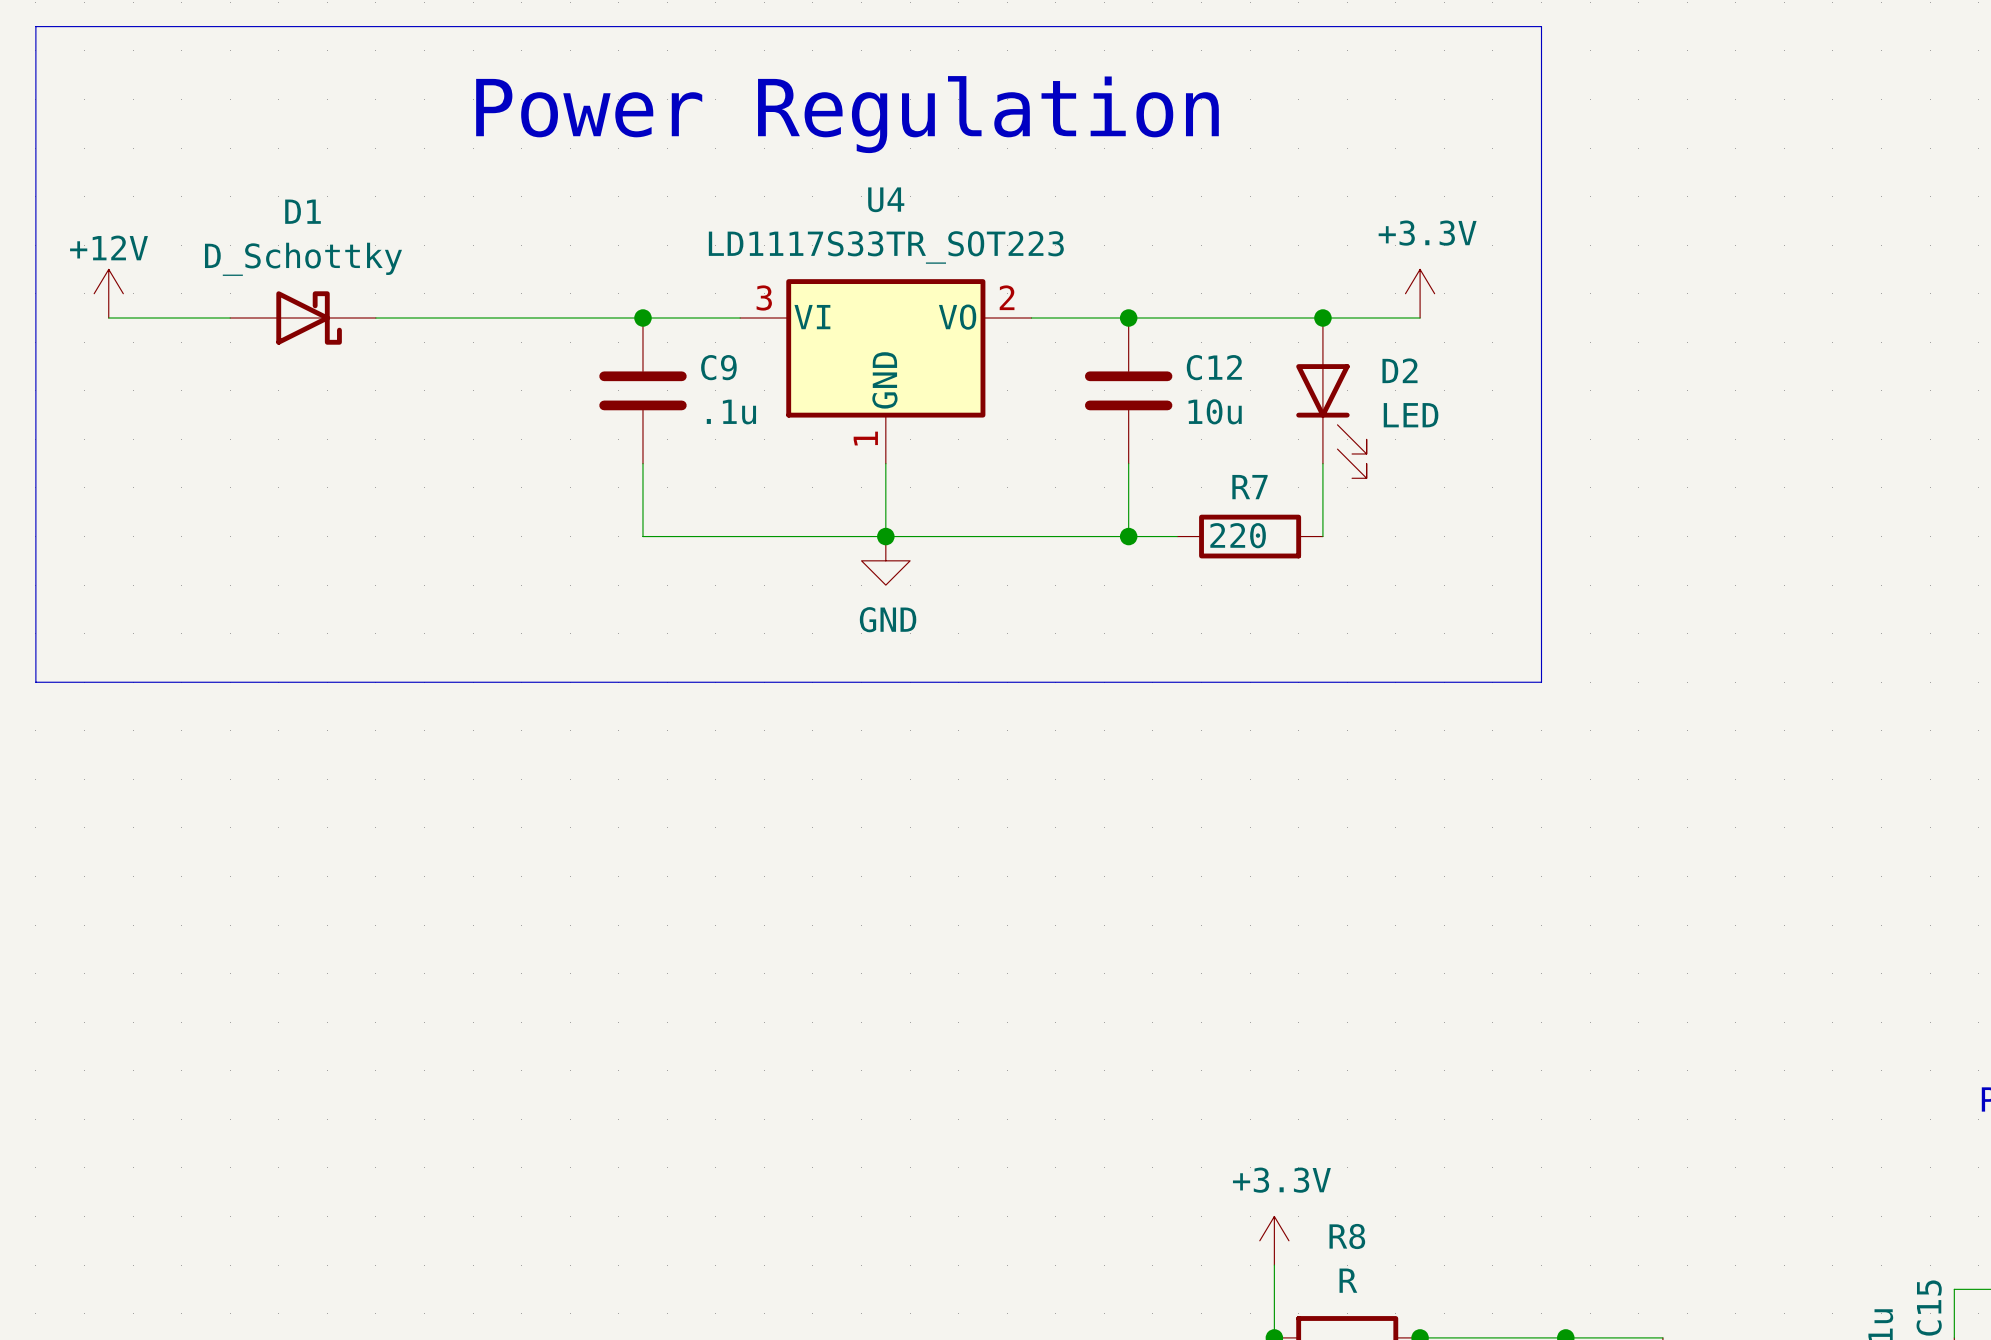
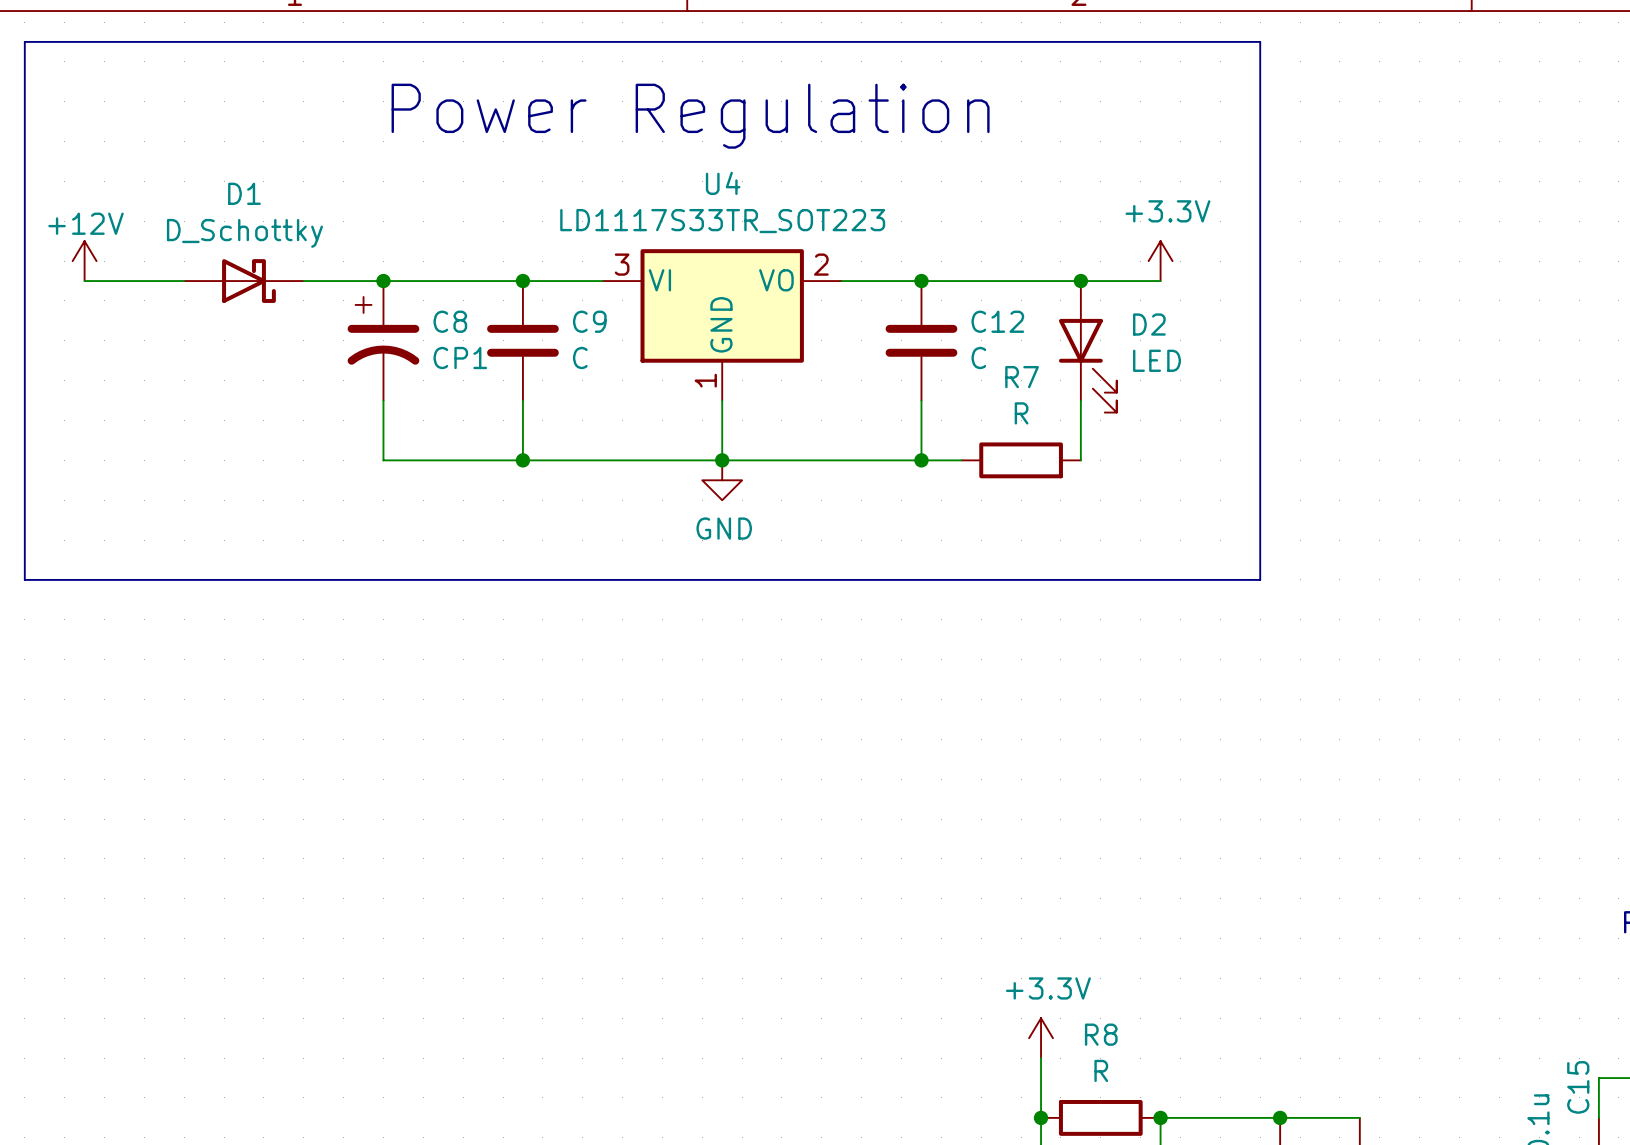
junction: none -> (383, 281)
C8: none -> CP1 (383, 340)
C12 value: 10u (1215, 411) -> C (978, 358)
C9 value: .1u (731, 412) -> C (580, 358)
wire: none -> (383, 400) (383, 460) (522, 460)
R7 name position: R7 (1250, 487) -> R7 (1022, 377)
R7 value: 220 (1238, 535) -> R (1021, 413)
junction: none -> (522, 460)

